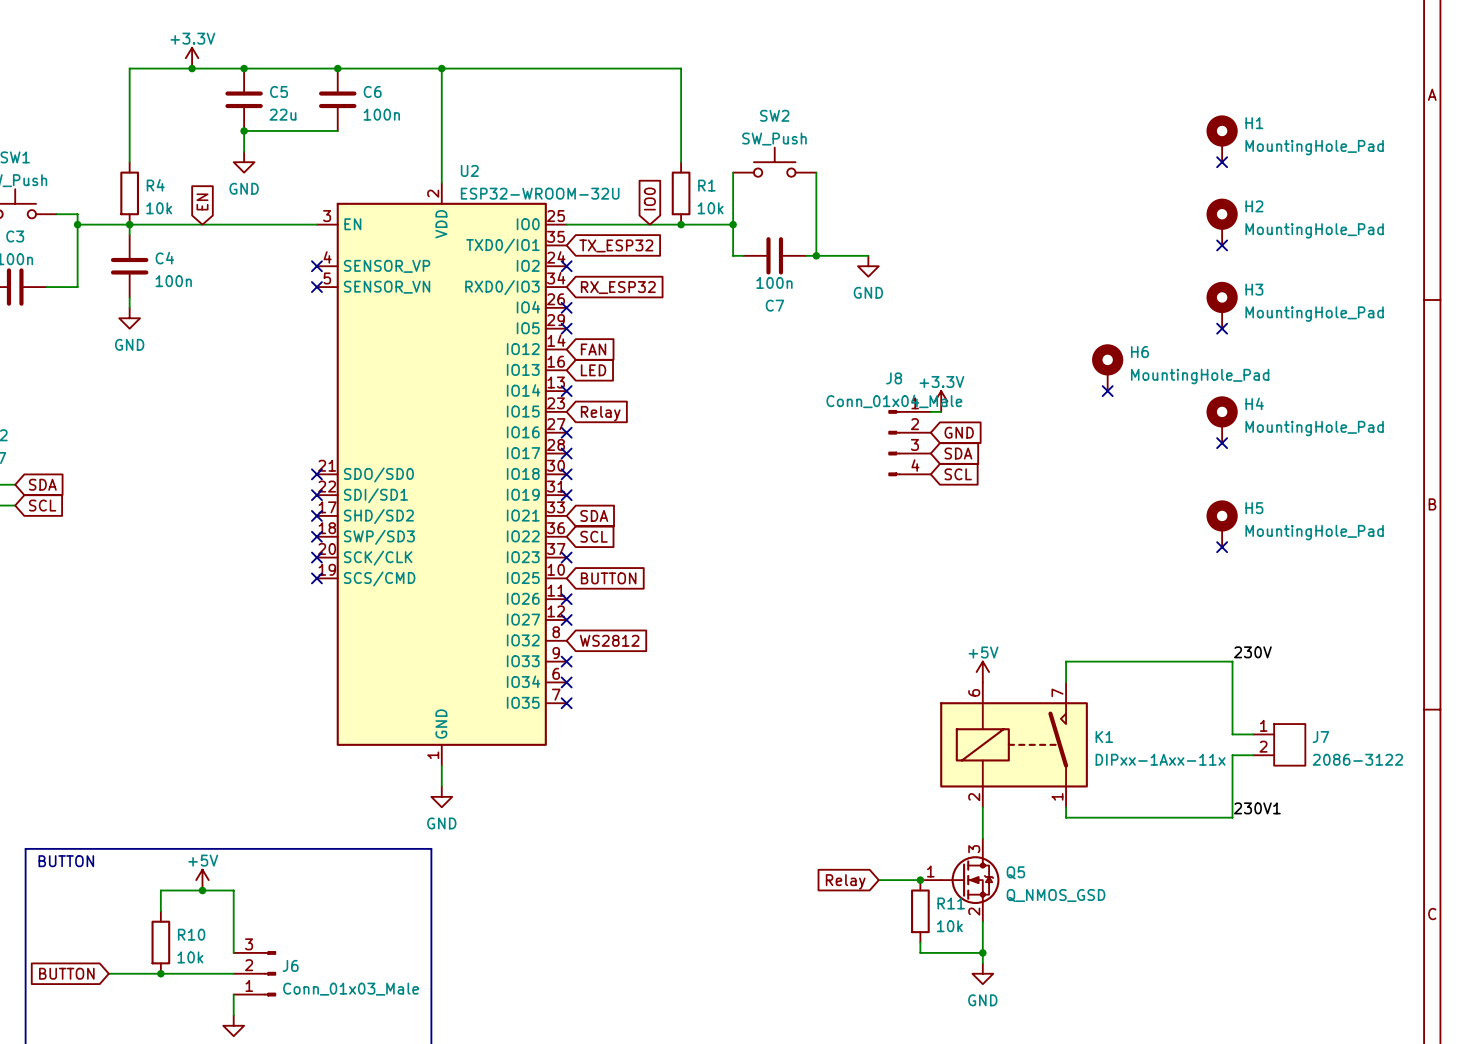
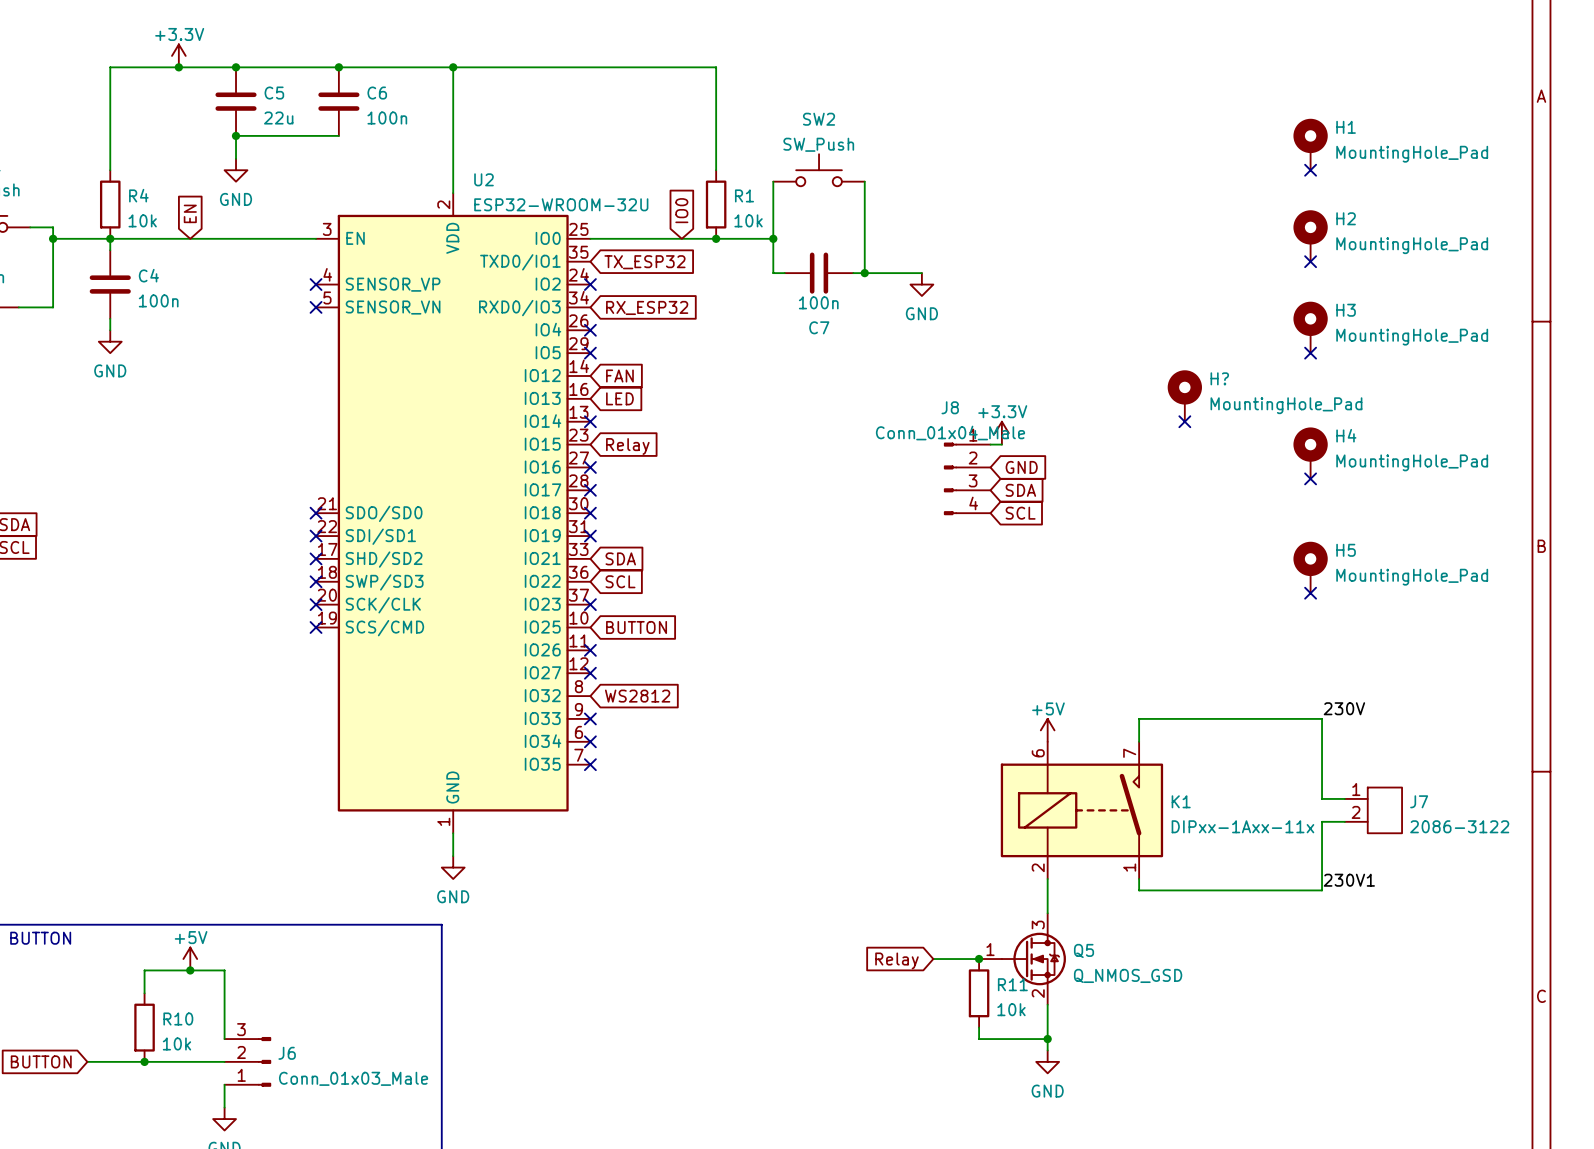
H6 name: H6 (1139, 352) -> H? (1219, 378)

